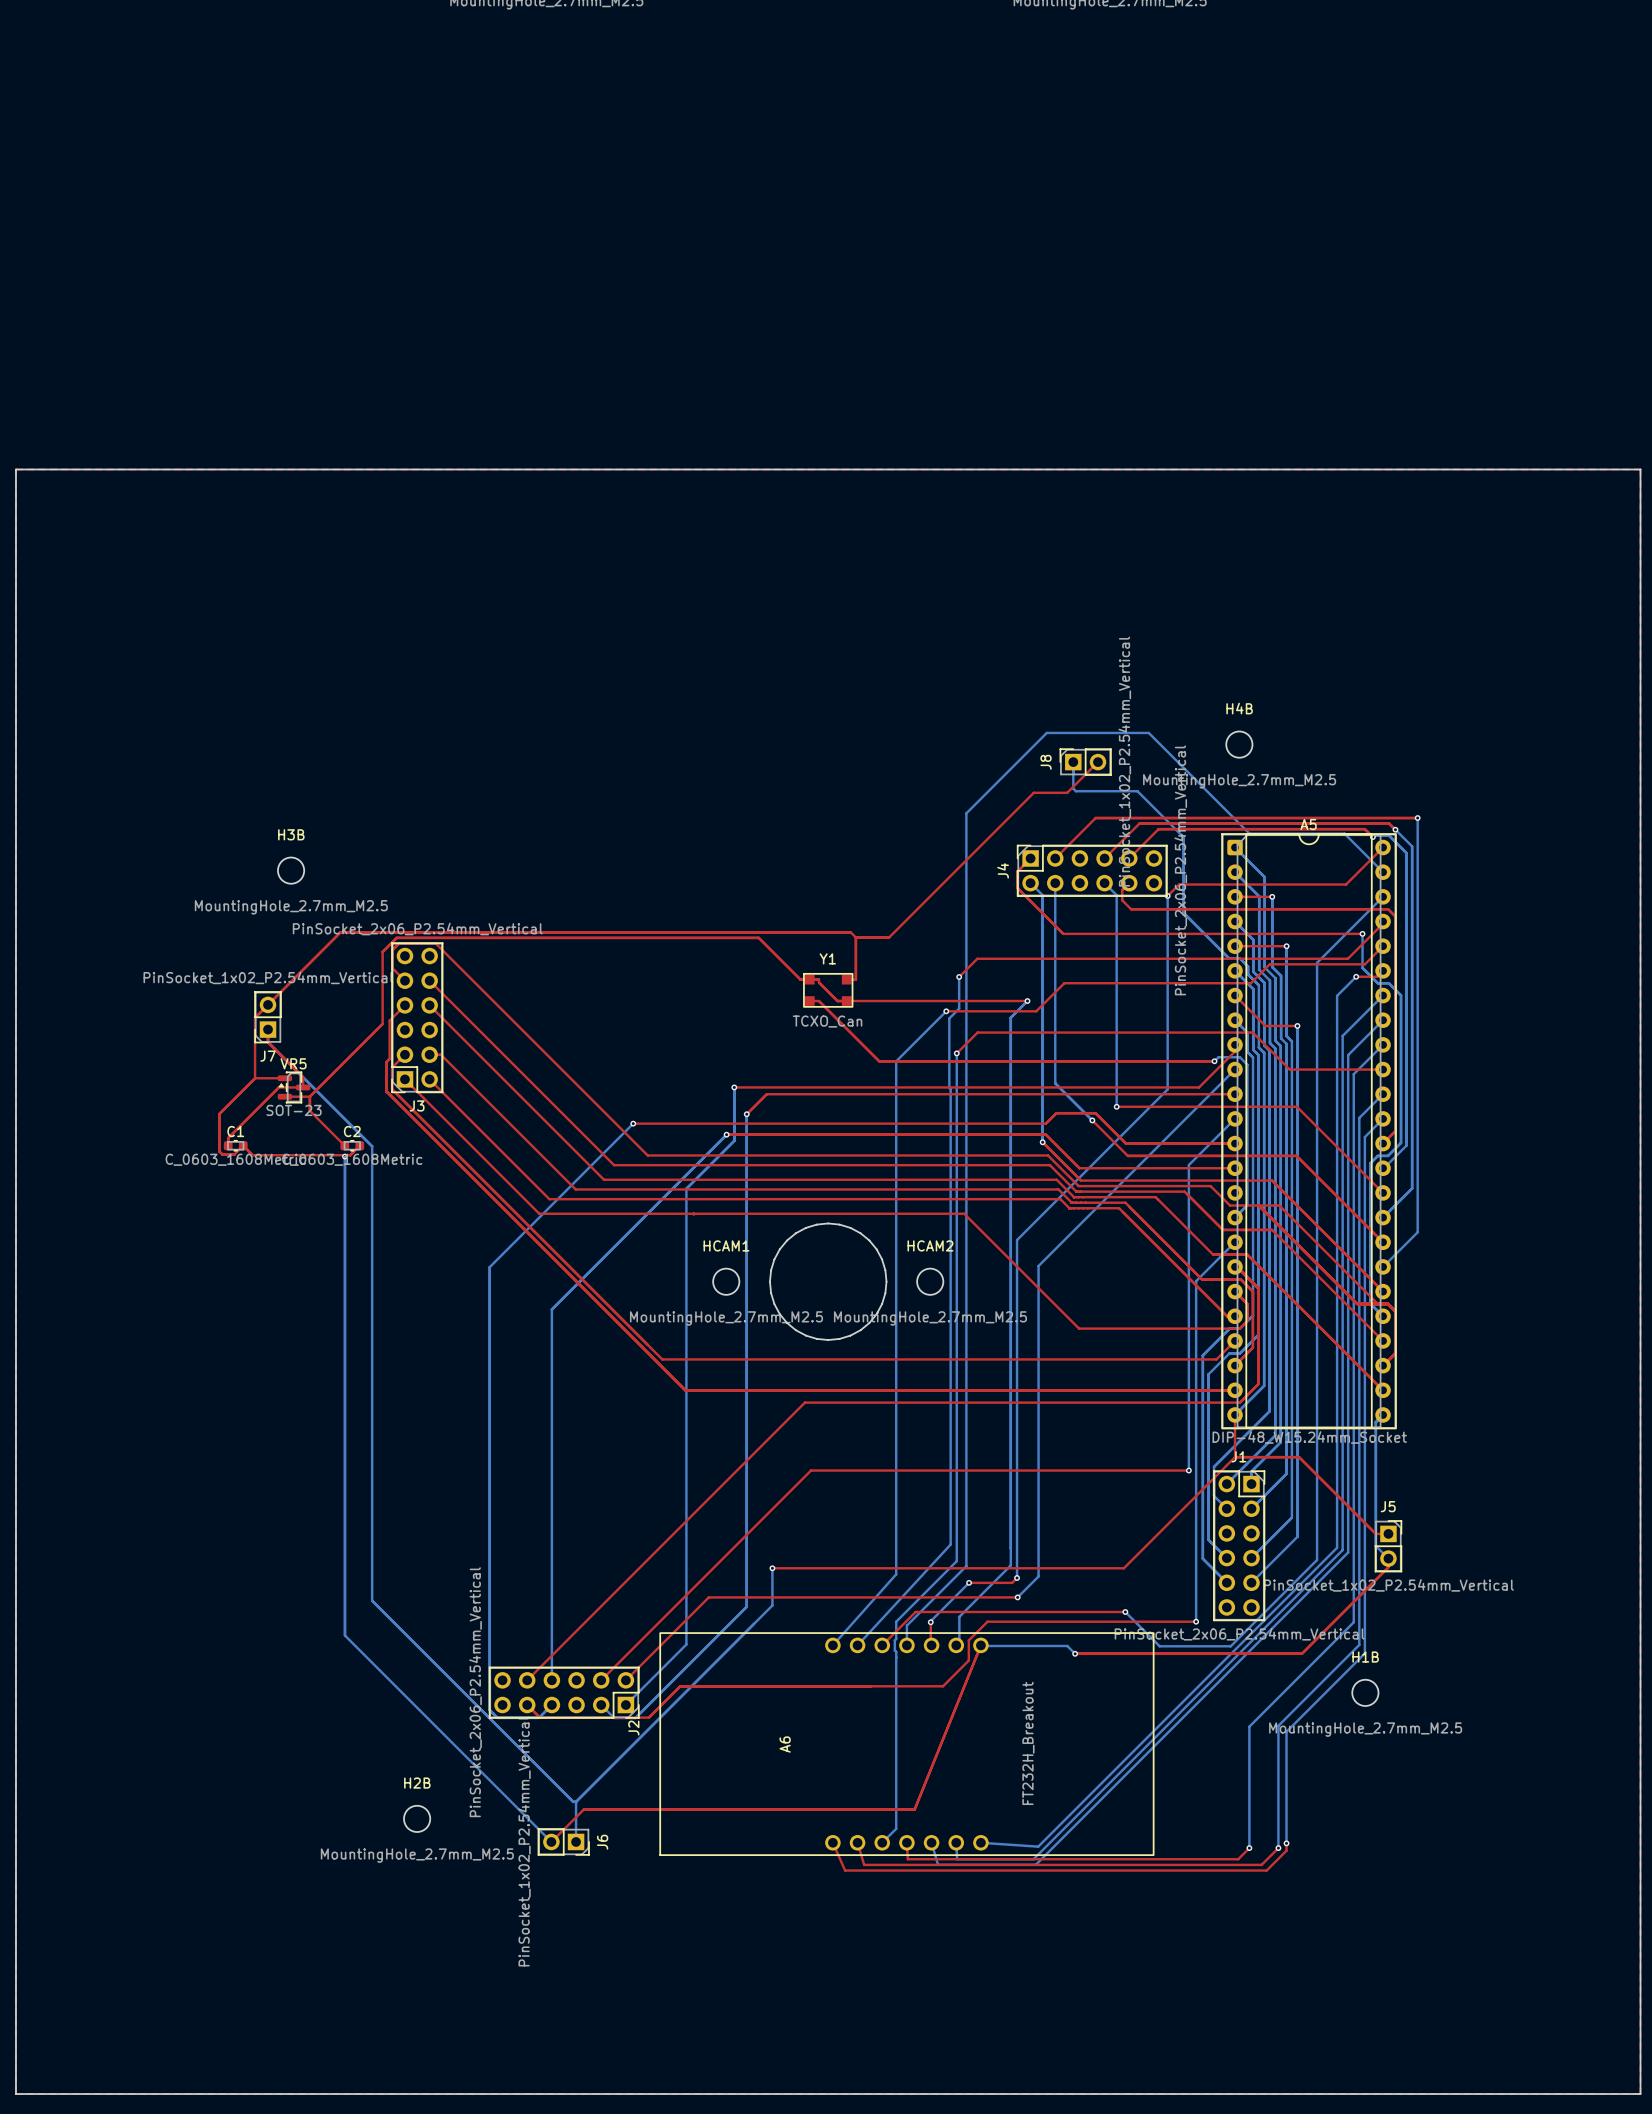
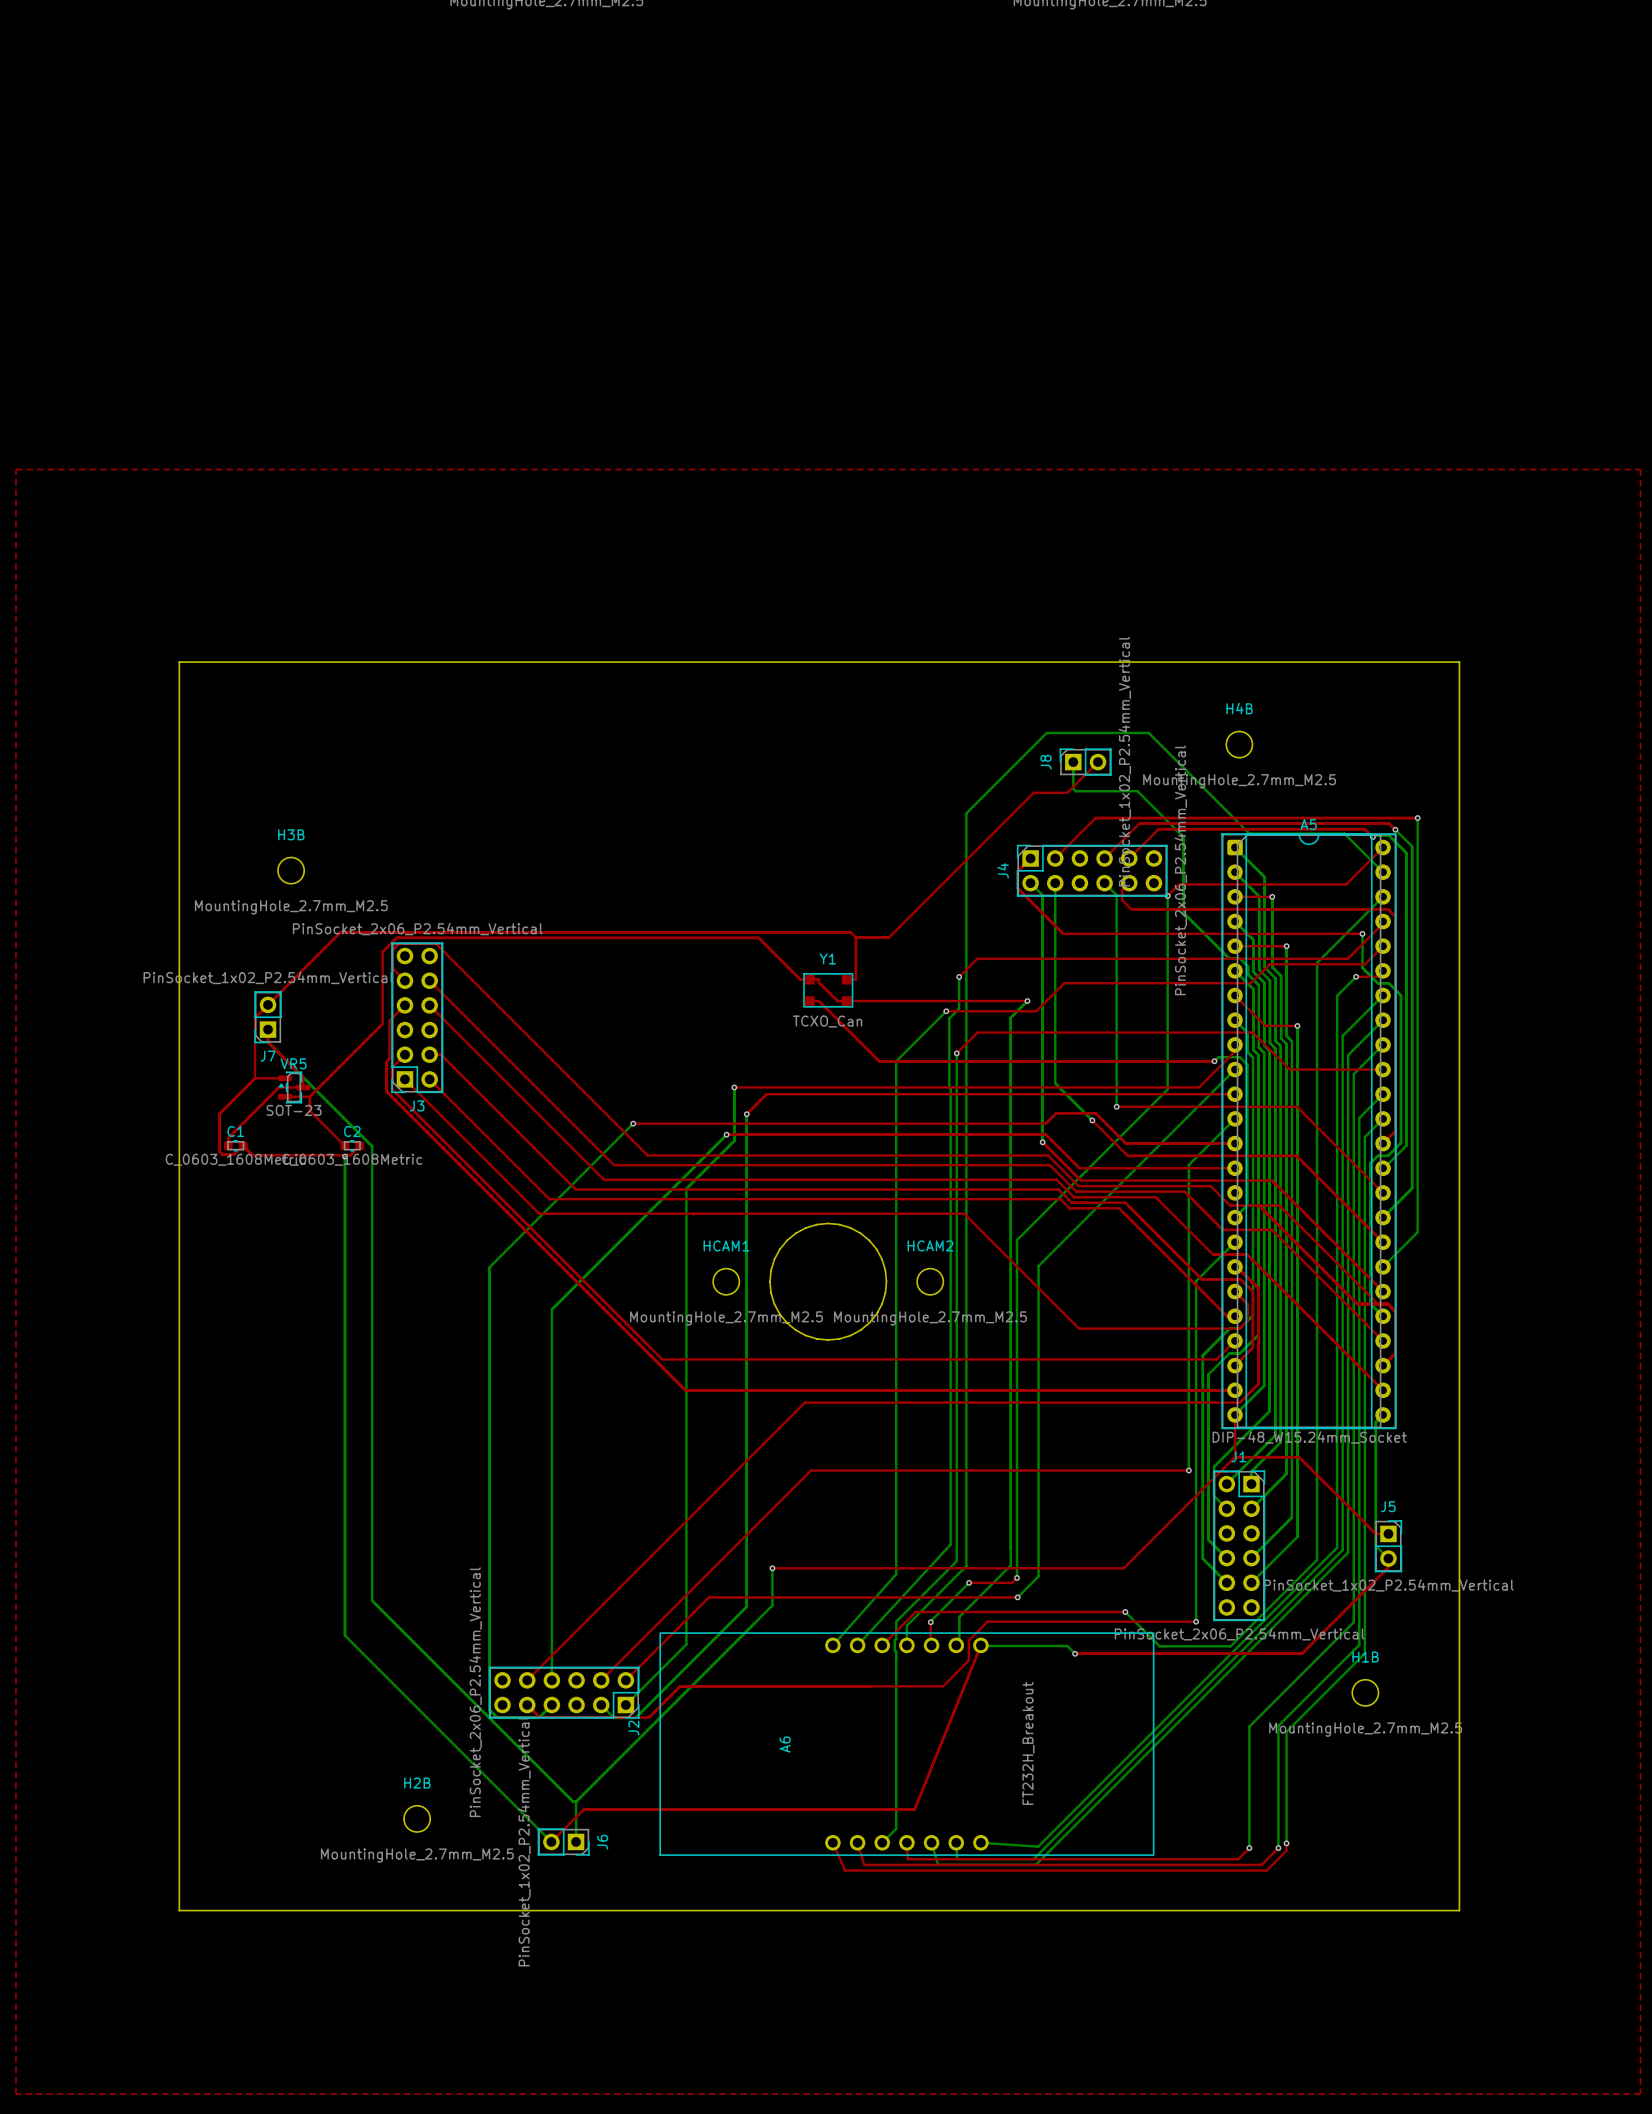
board edge: (15, 469) (1640, 469) (1640, 2094) (15, 2094) (15, 469) -> (179, 662) (179, 1910) (1459, 1910) (1459, 662) (179, 662)

